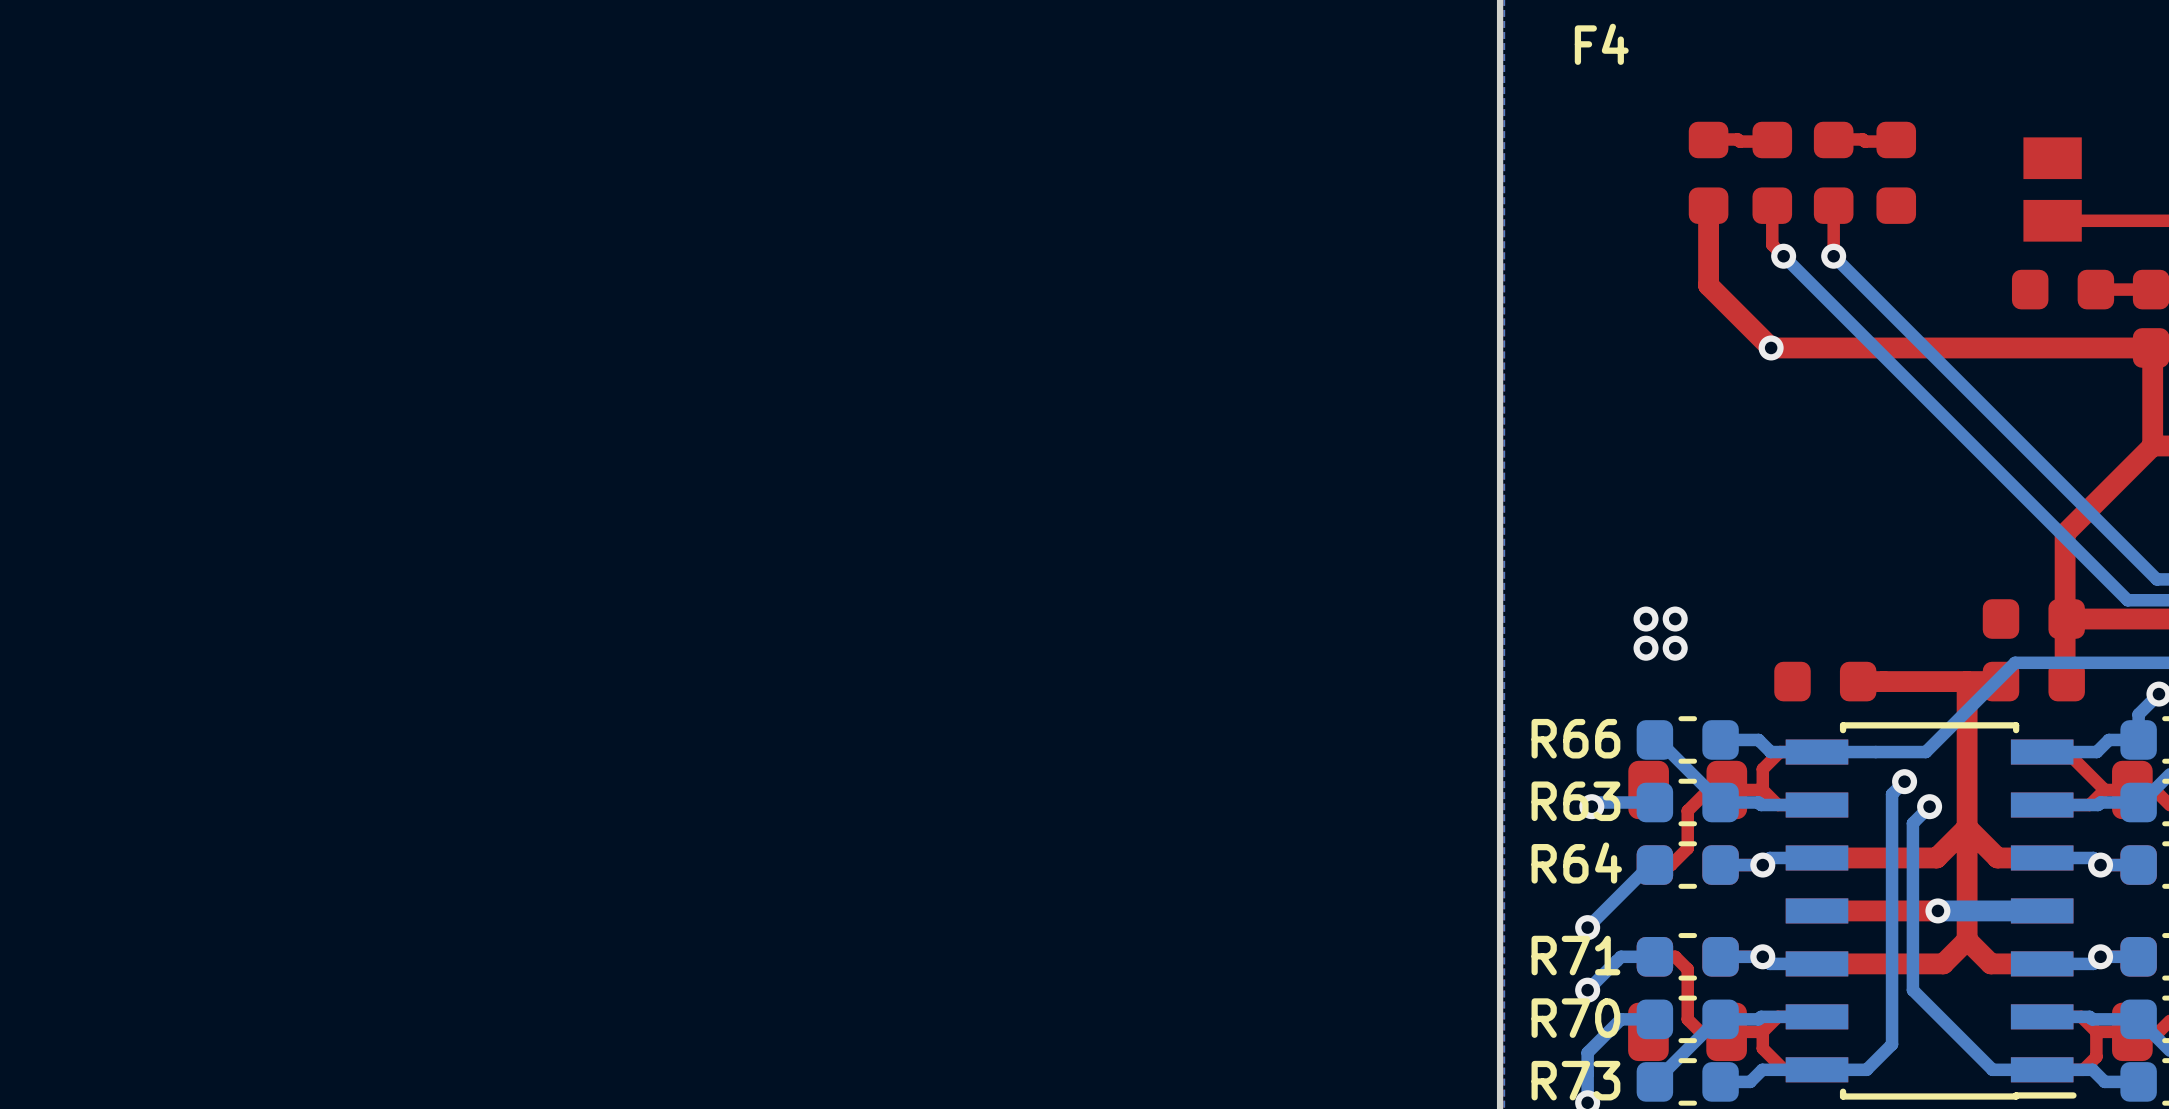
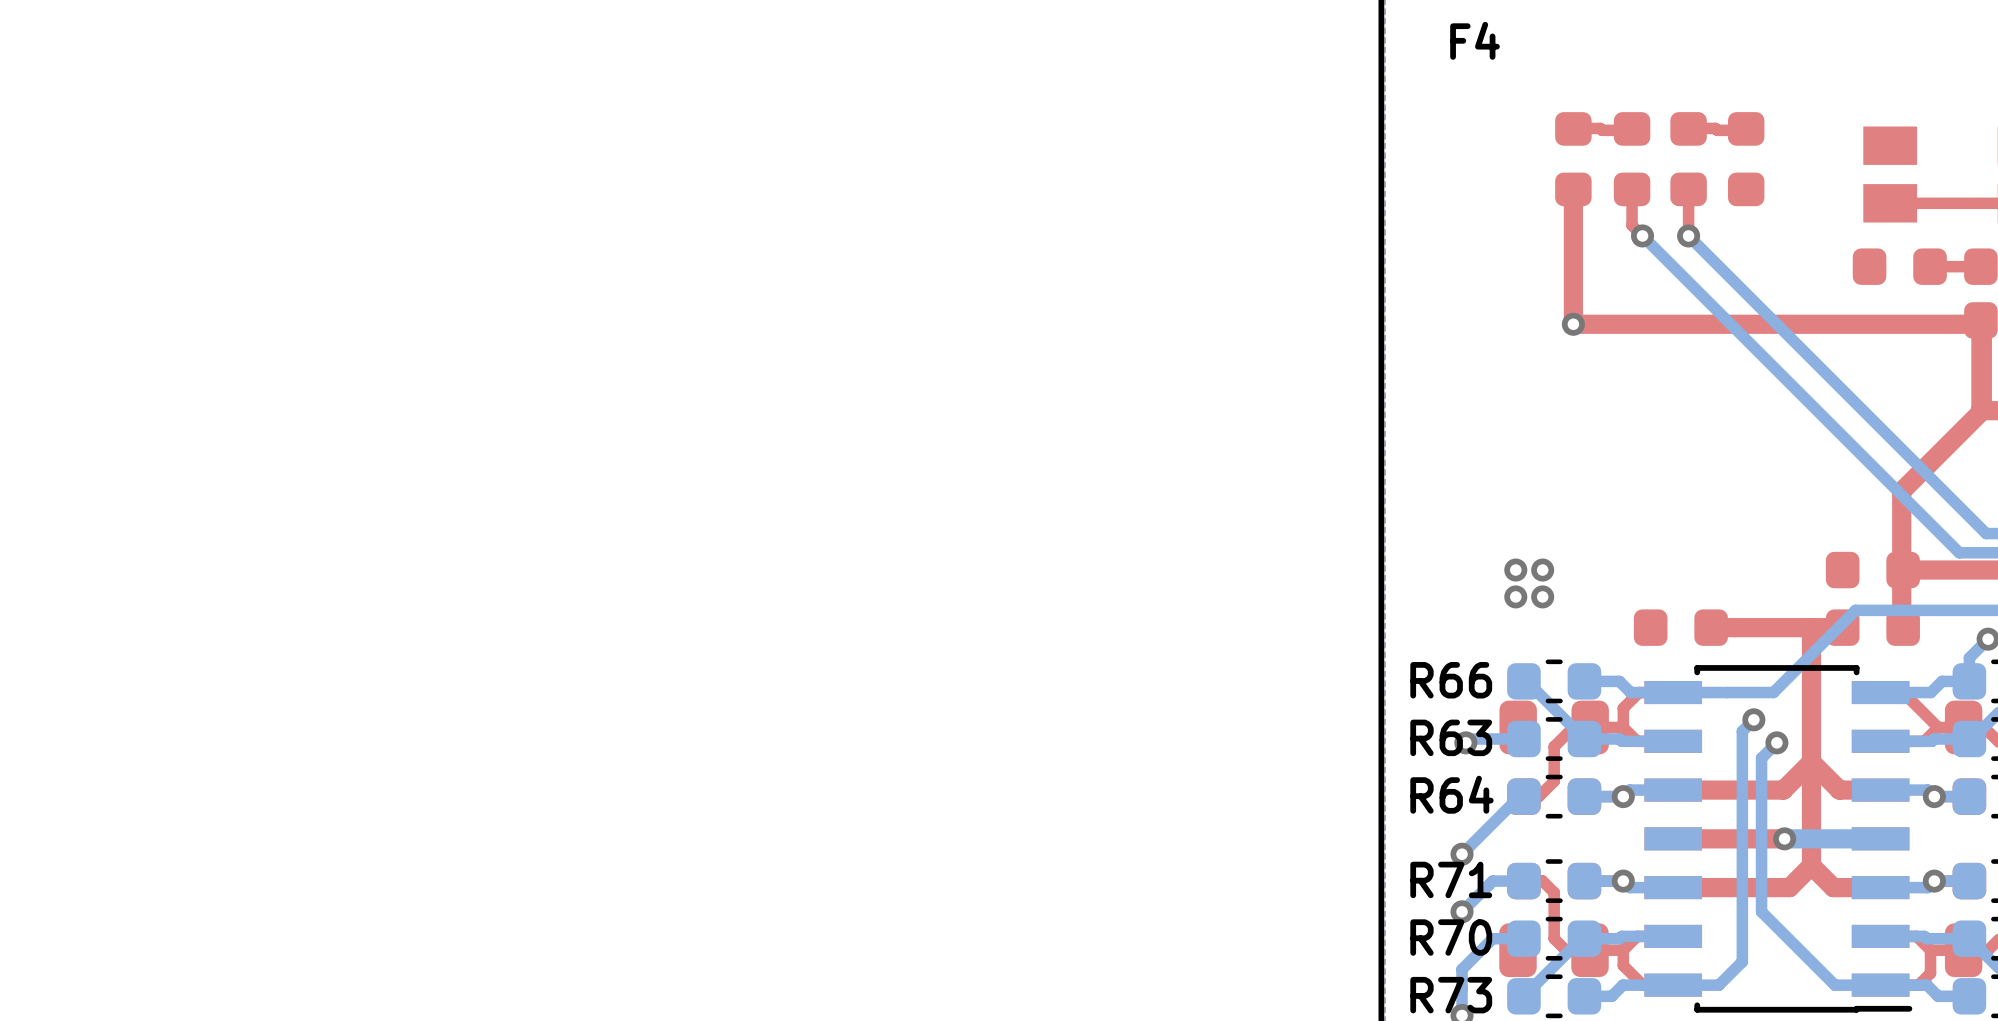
top track: (1708, 285) (1771, 347) (2151, 347) -> (1573, 262) (1573, 324) (1980, 324) (1982, 410)
via position: (1771, 347) -> (1573, 324)

